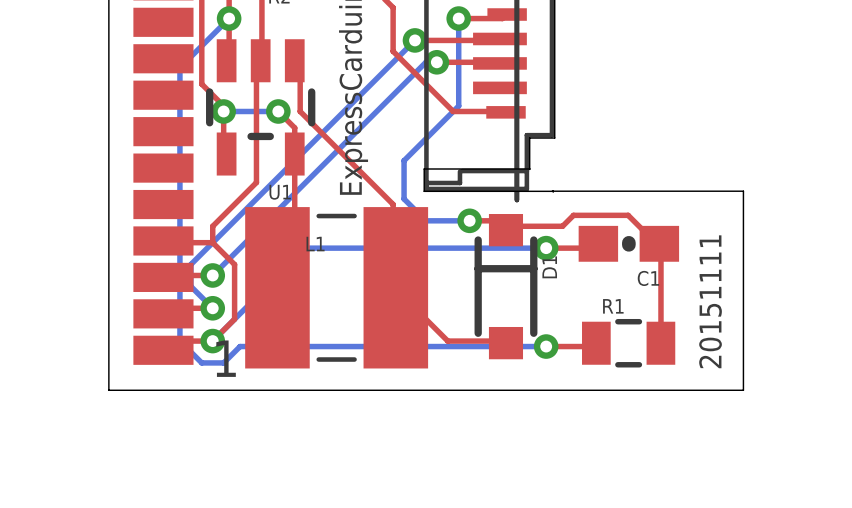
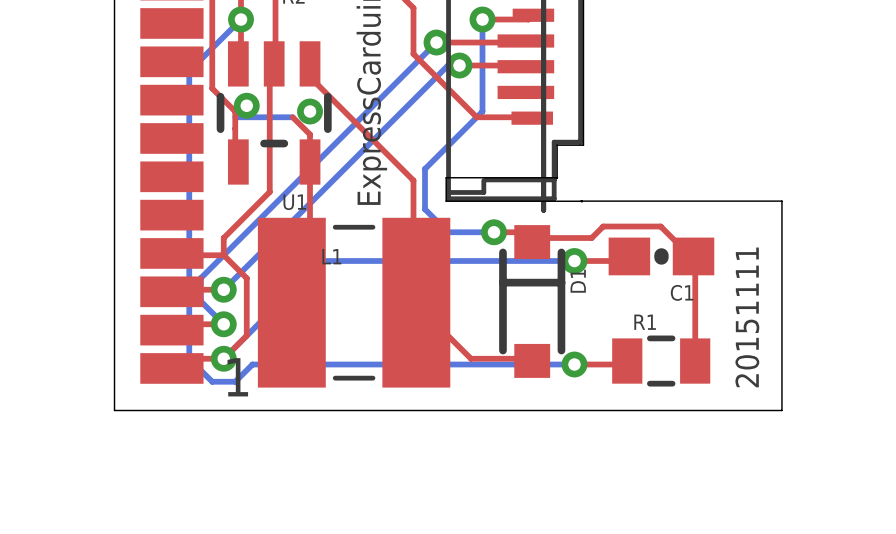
top track: (300, 78) (300, 111) (393, 204) -> (315, 82) (413, 180) (413, 215)
via position: (223, 111) -> (246, 105)
via position: (278, 111) -> (310, 111)

